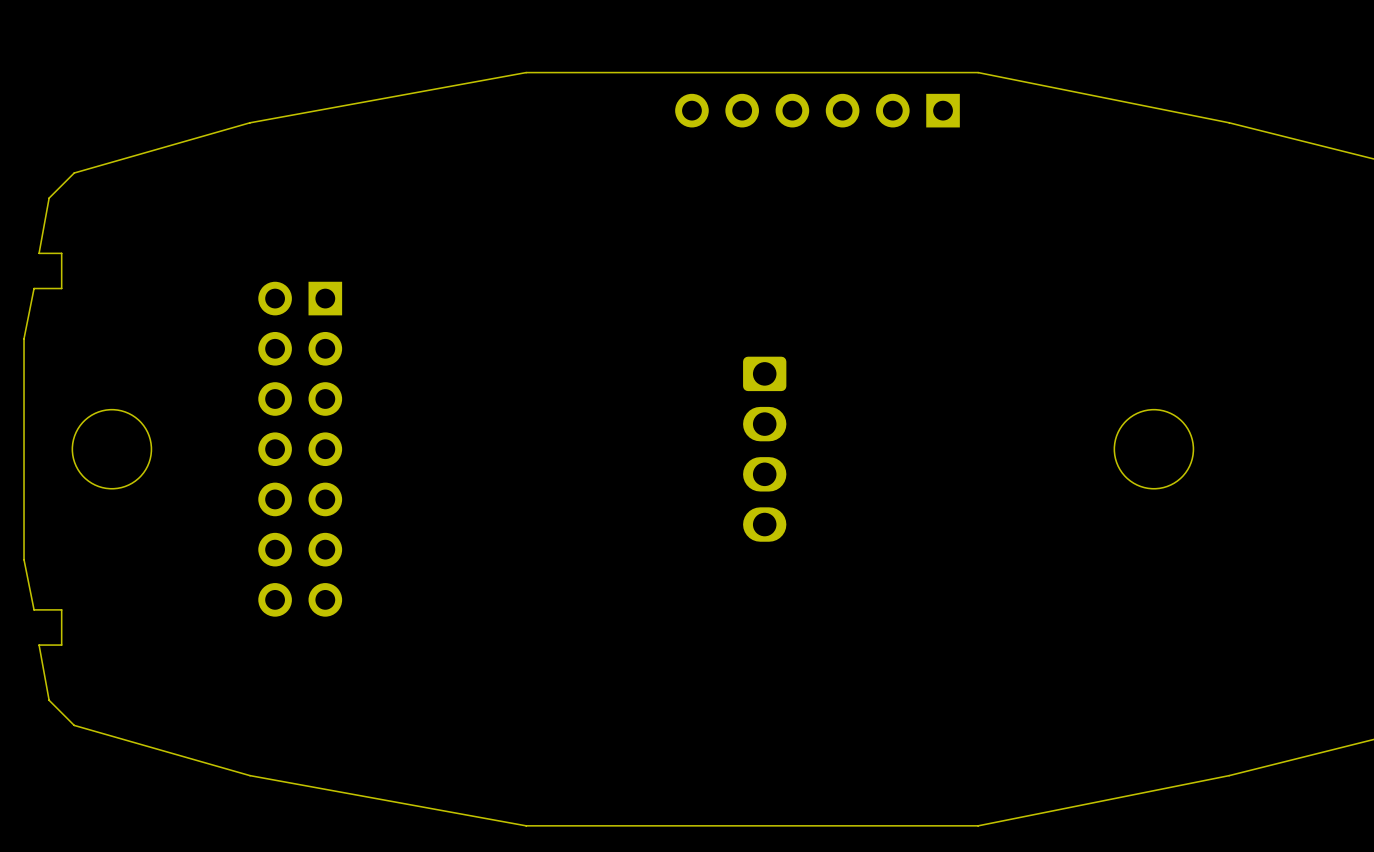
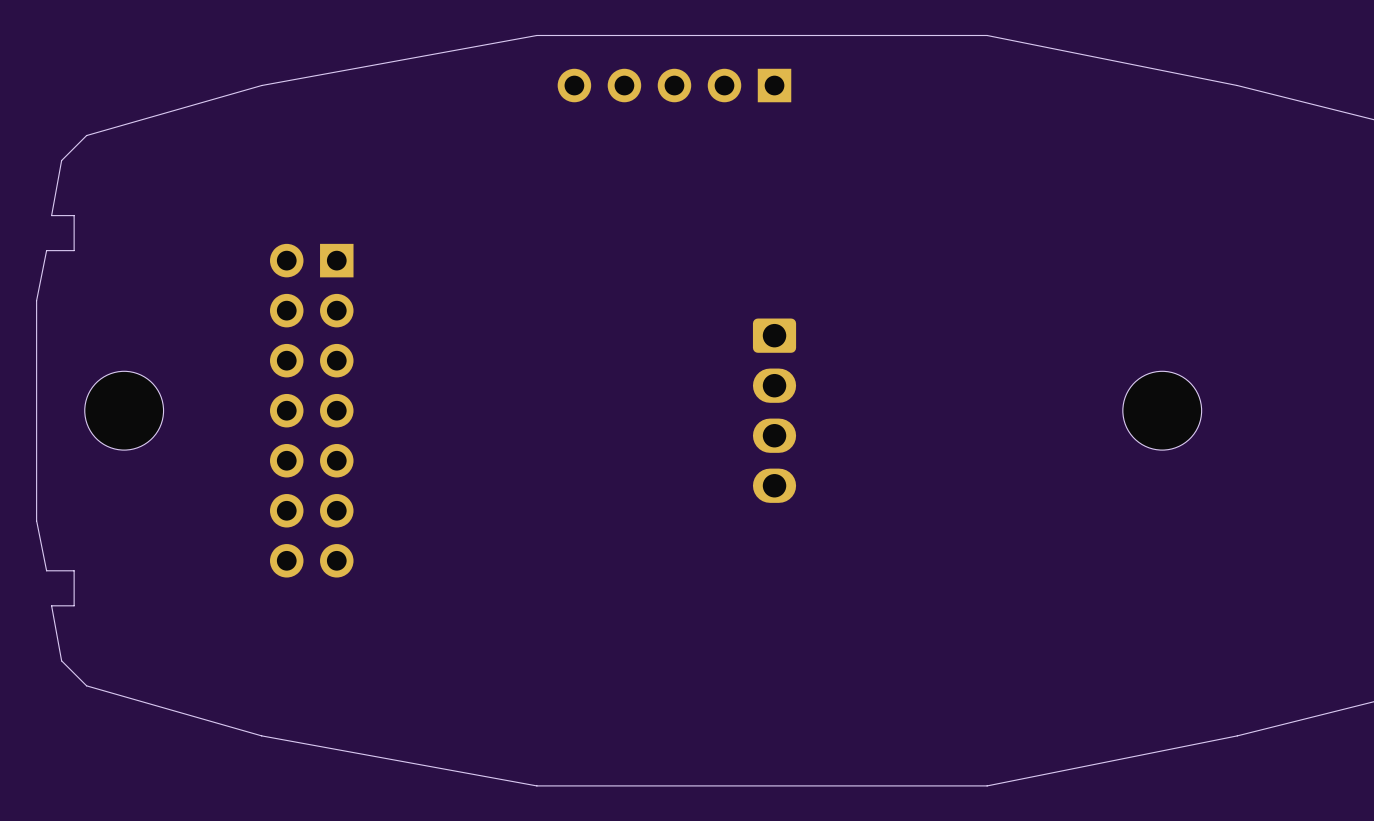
part: (817, 110) -> none
part: none -> (674, 85)

